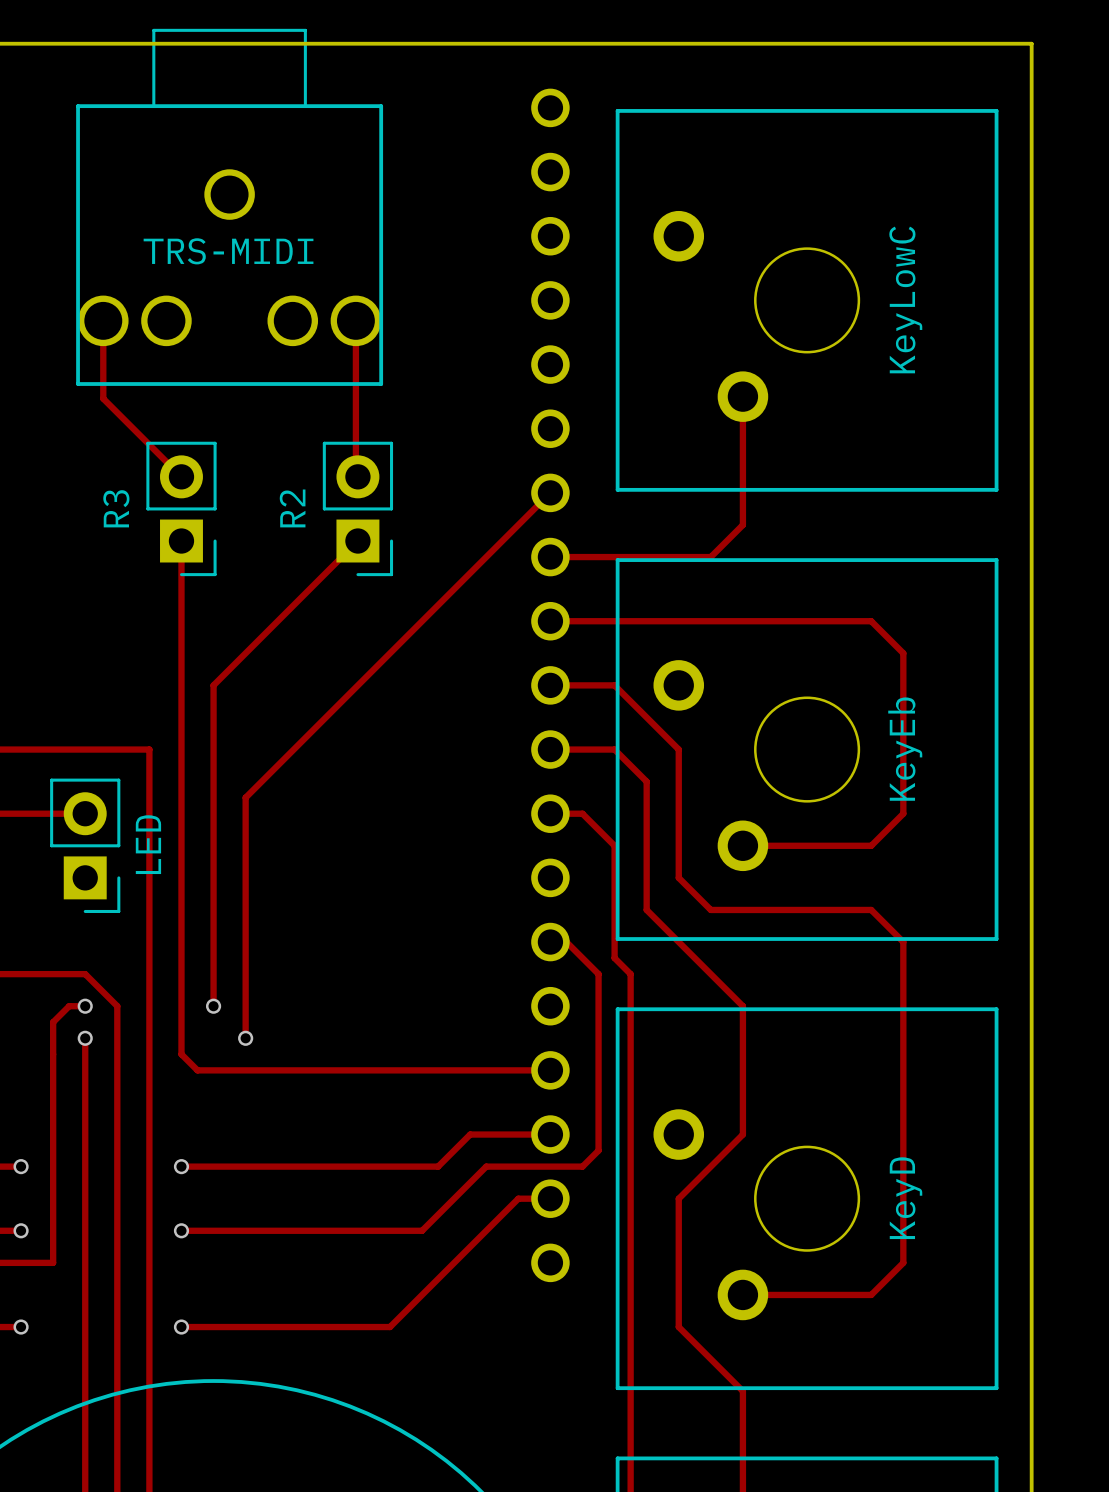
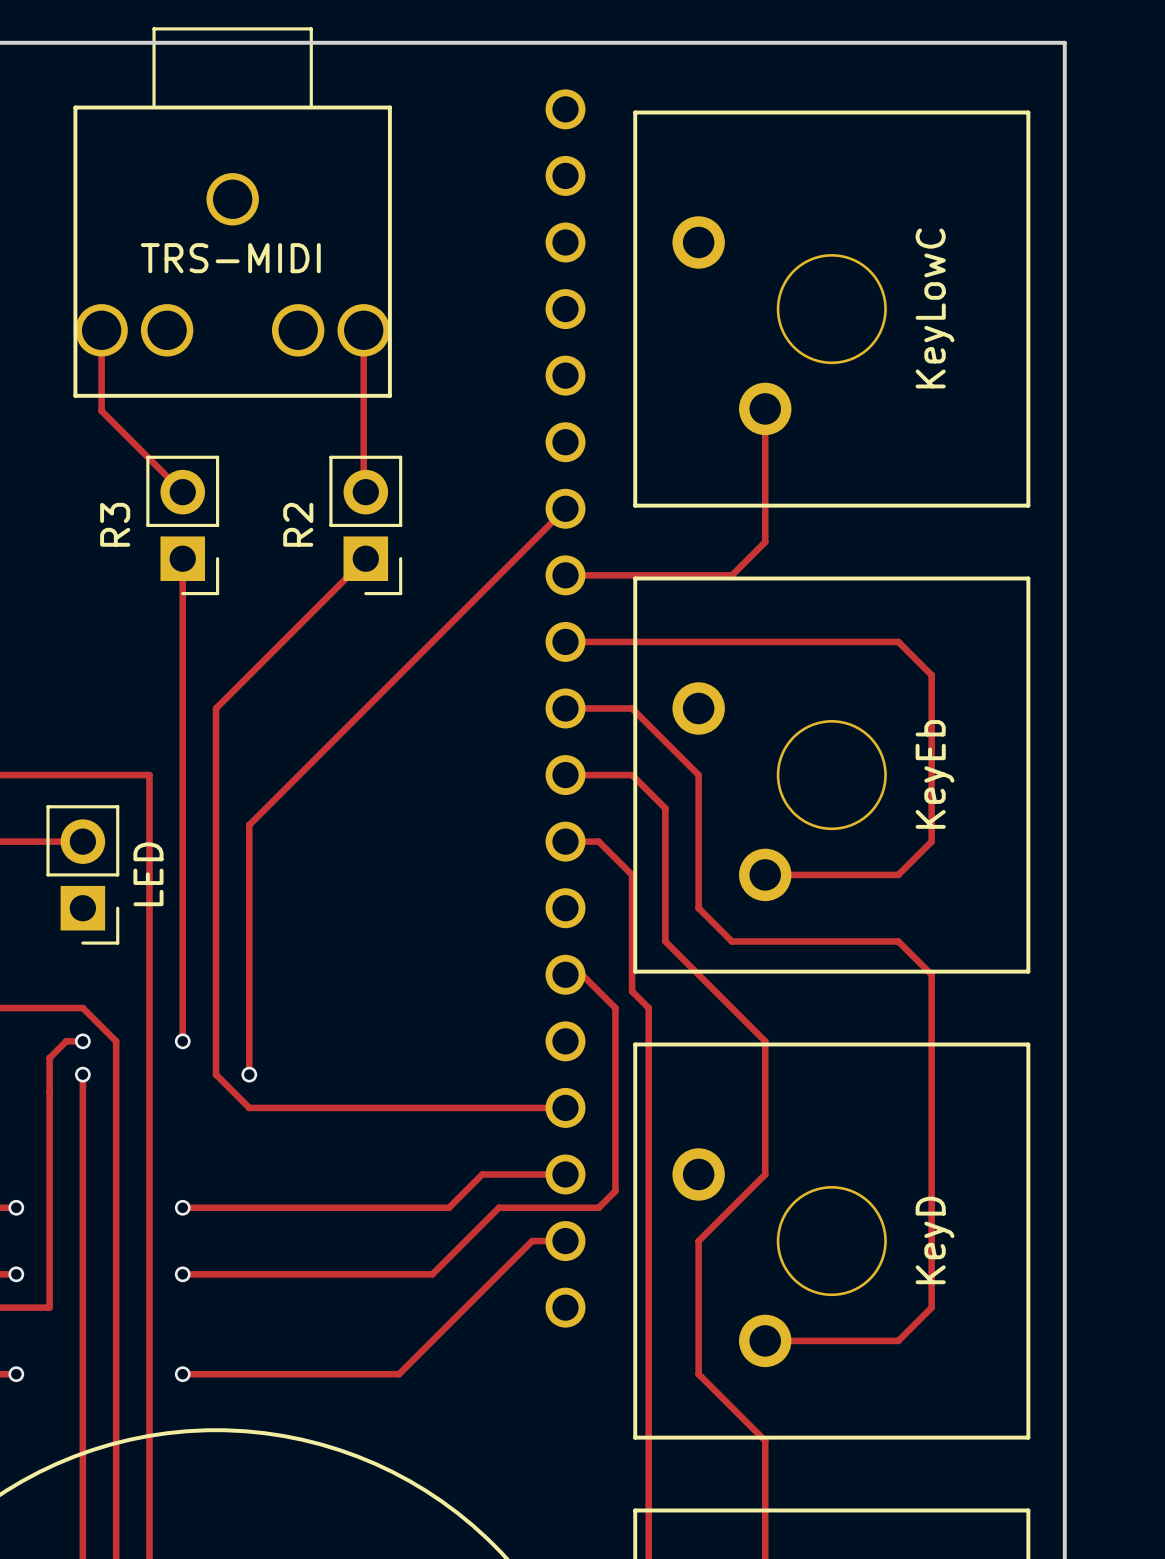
track: (181, 1006) (181, 1054) (197, 1070) (245, 1070) -> (216, 1041) (216, 1074) (249, 1107)
via position: (213, 1006) -> (182, 1041)

